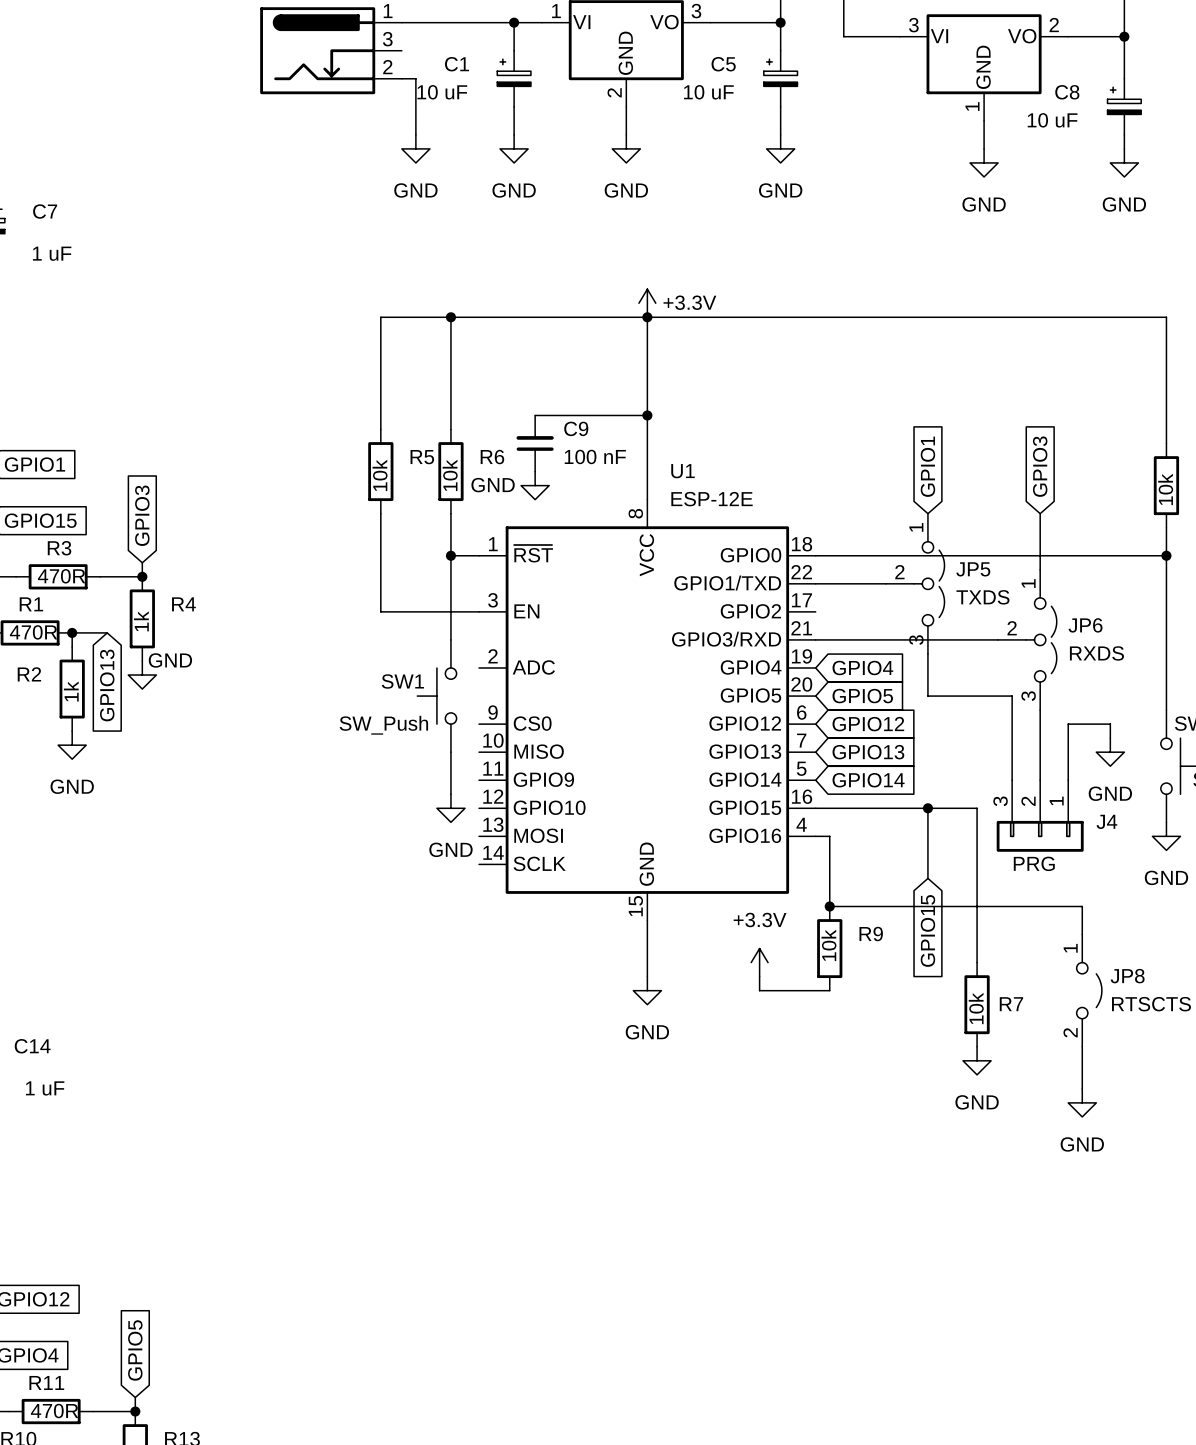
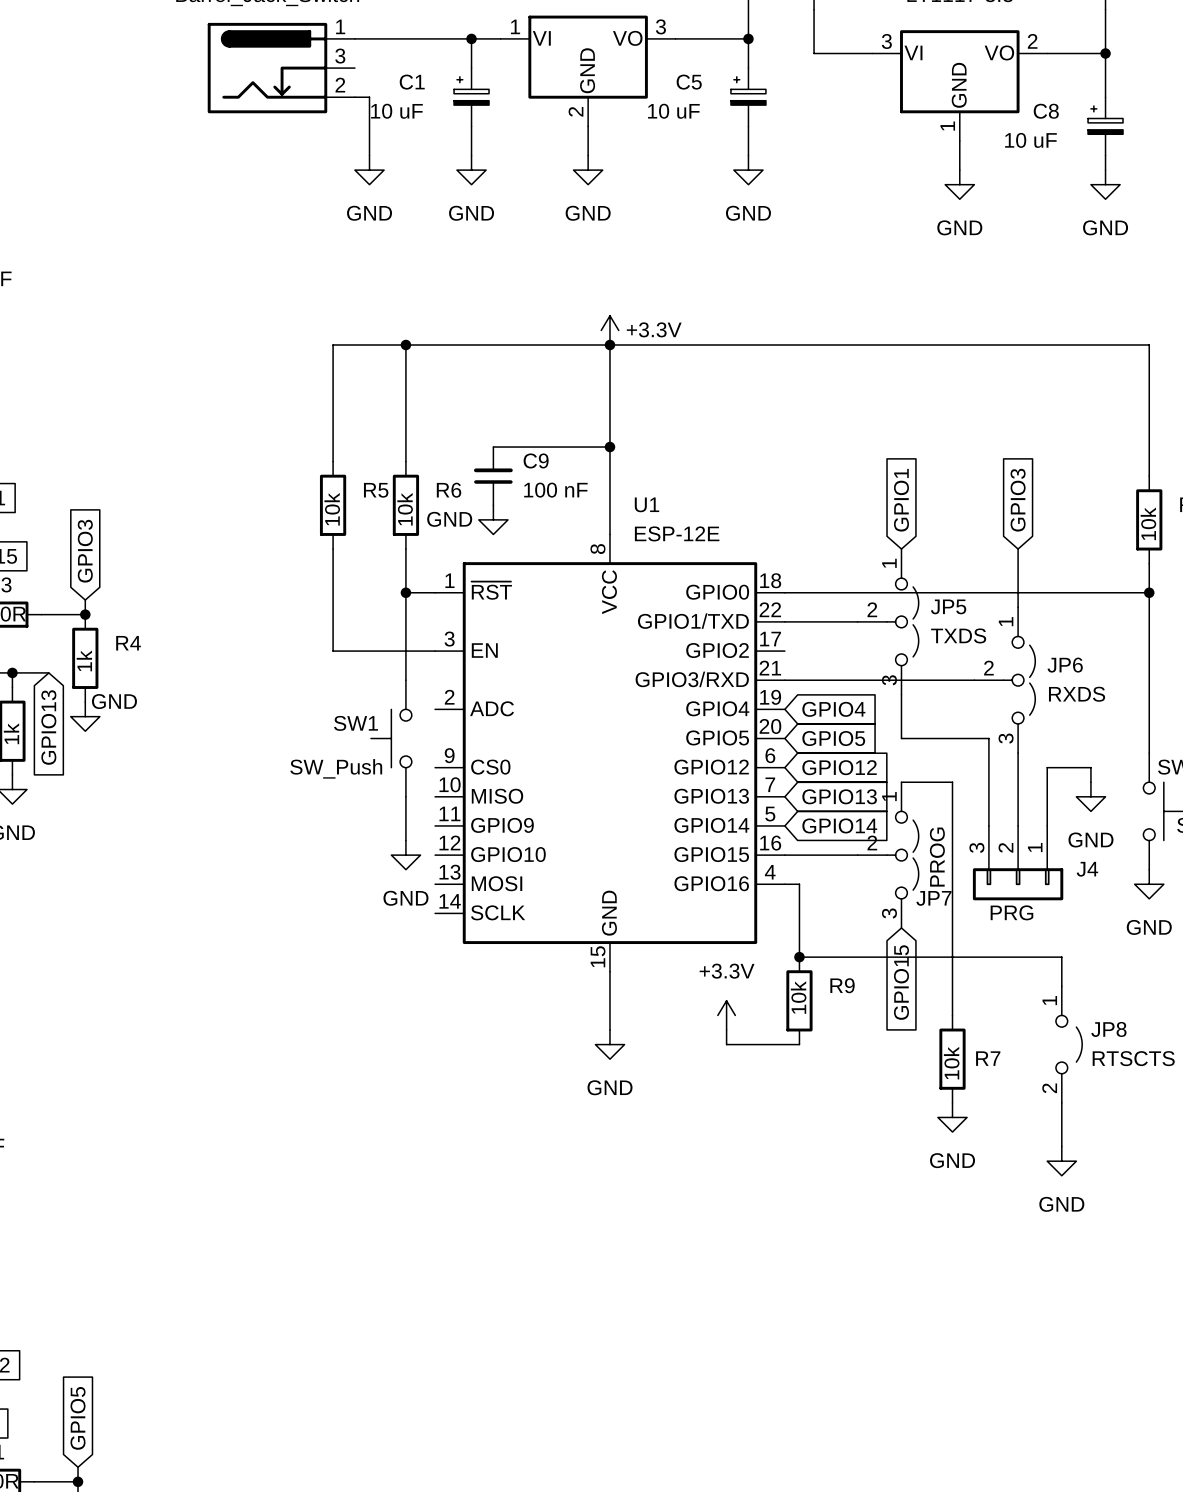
wire: (885, 808) (977, 808) -> (901, 782) (952, 782) (952, 855)
JP7: none -> PROG (888, 855)
wire: (927, 808) (927, 878) -> none
junction: (927, 808) -> none

